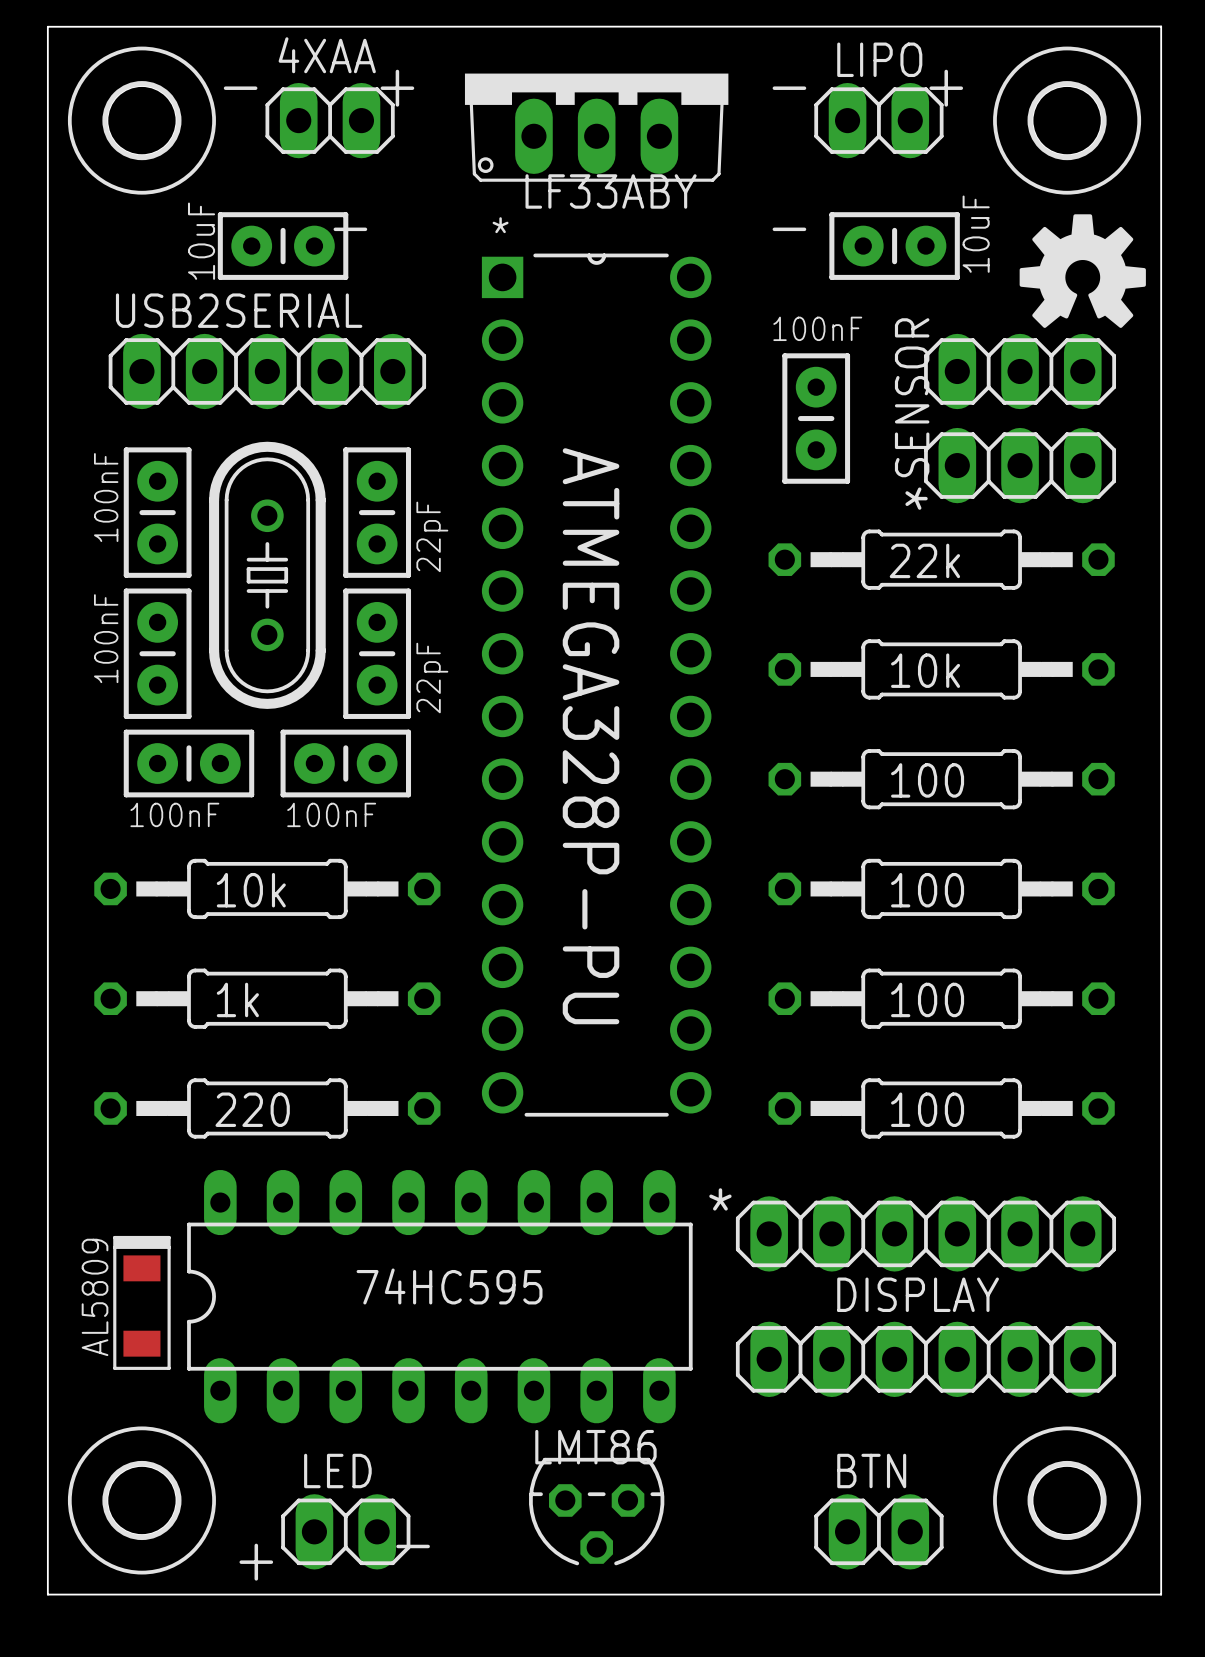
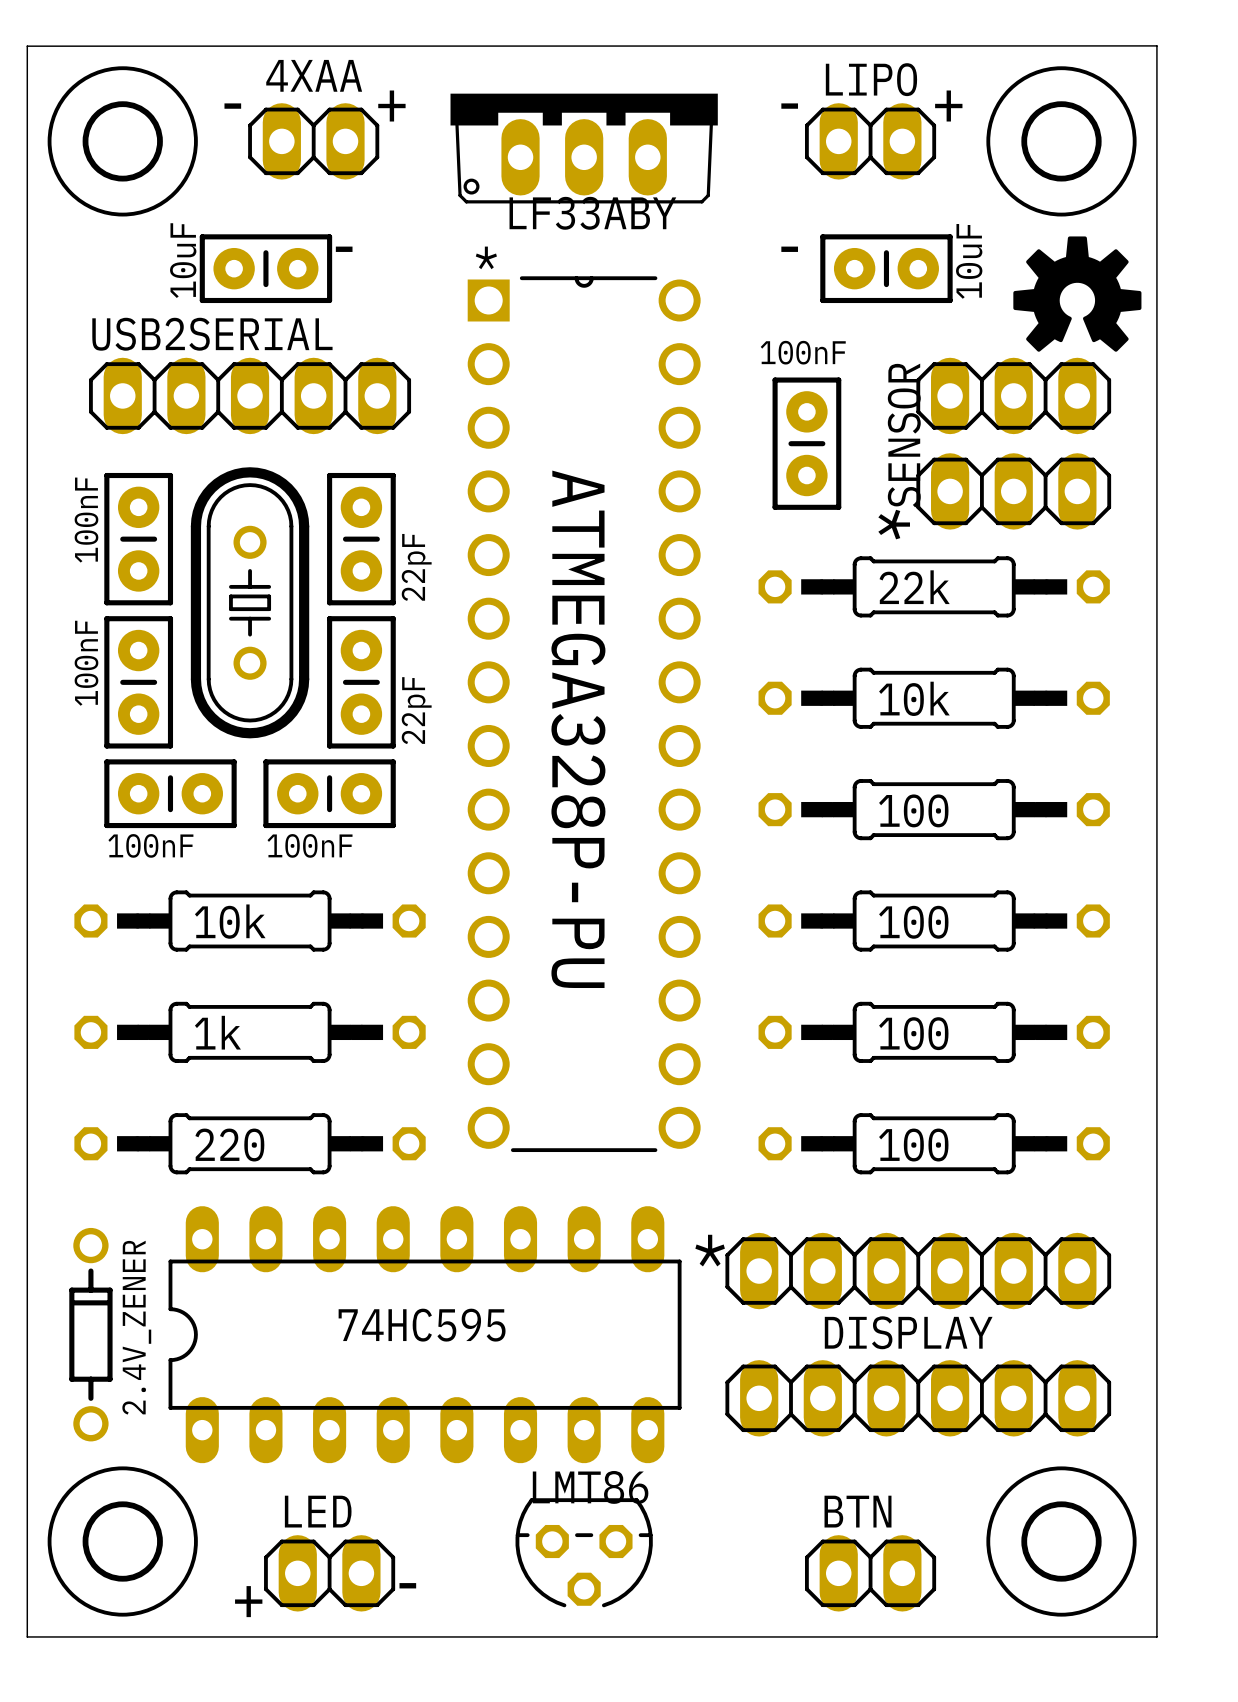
2.4V_ZENER: none -> (90, 1334)
part: (141, 1302) -> none

